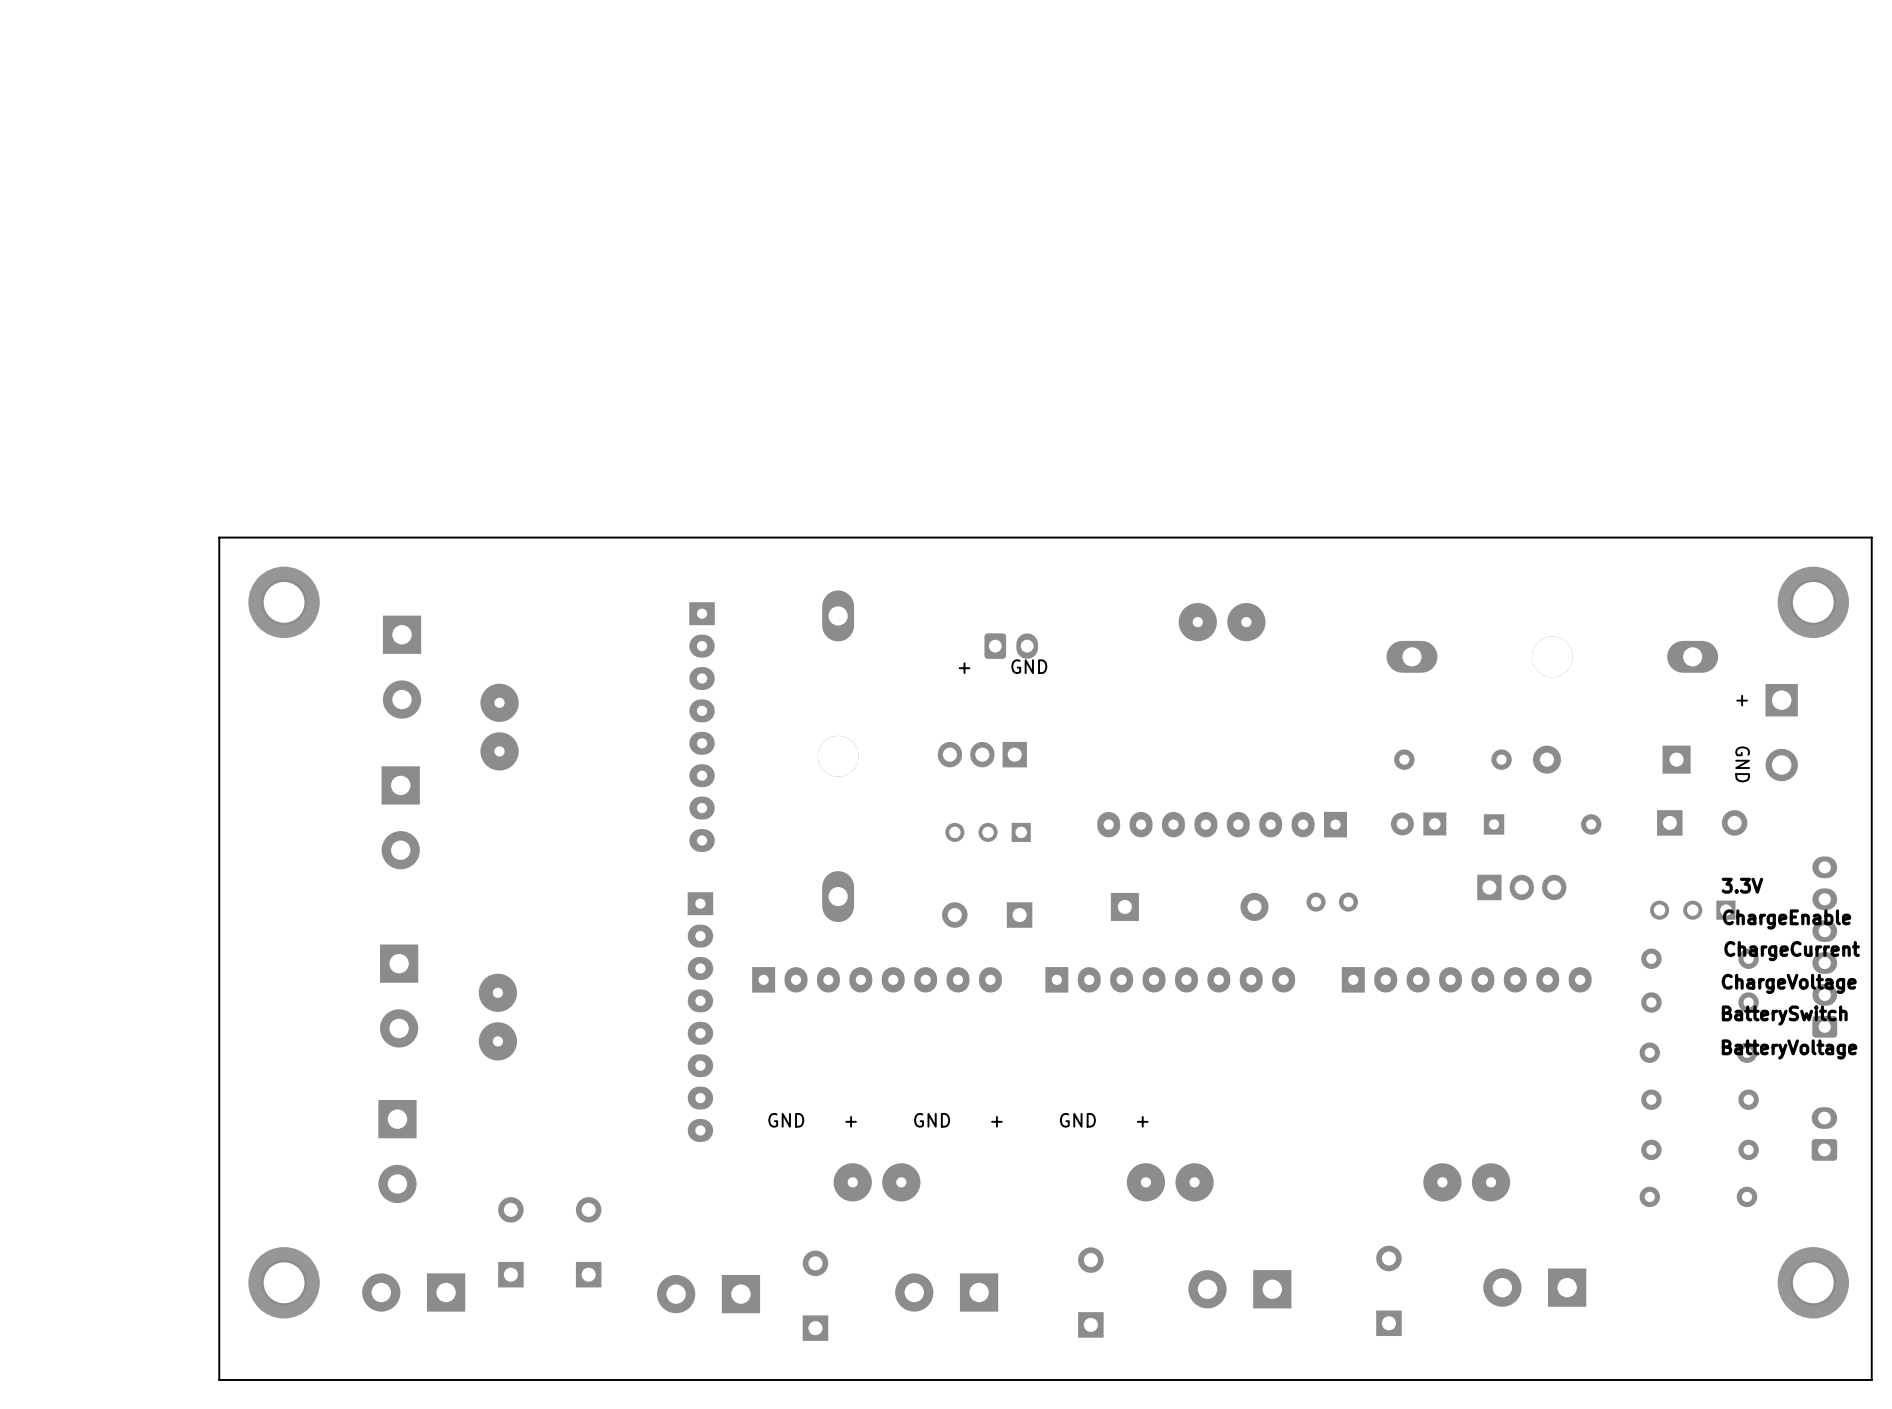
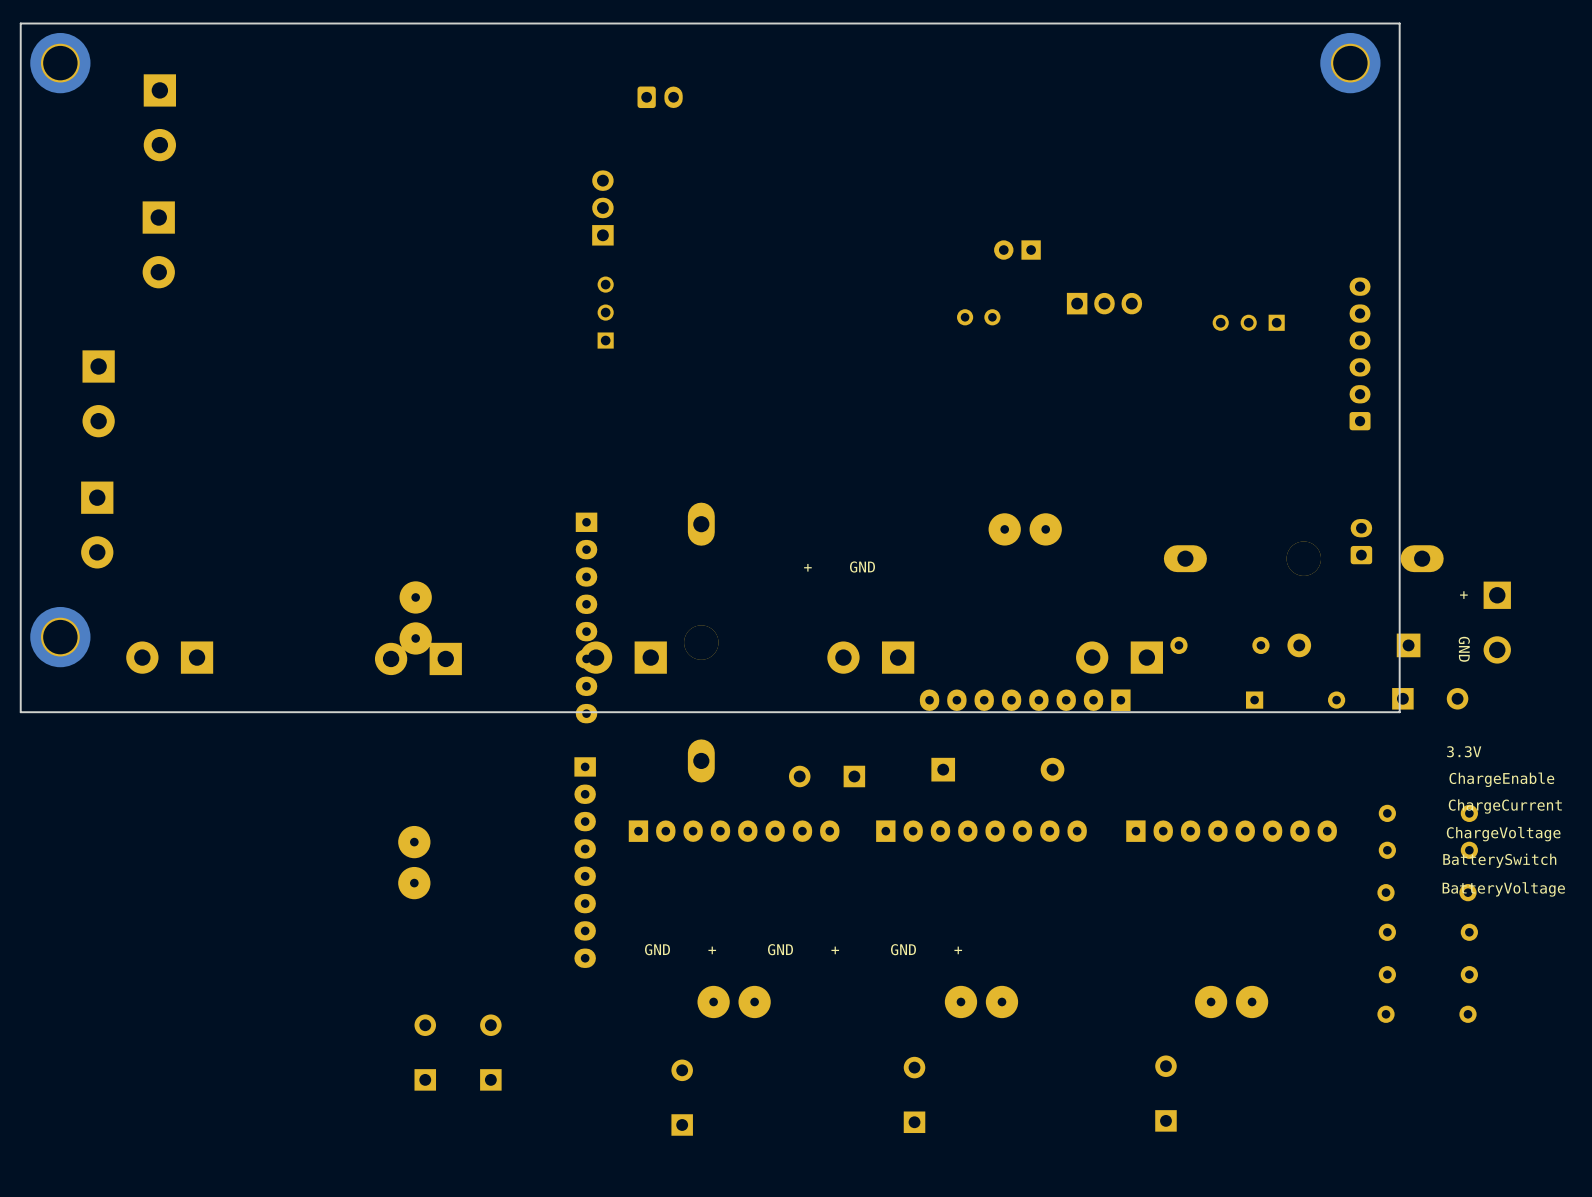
board edge: none -> (1399, 23) (20, 23) (20, 712) (1399, 712) (1399, 23)
part: none -> (60, 63)
part: none -> (1350, 63)
part: none -> (660, 97)
part: none -> (159, 117)
part: none -> (602, 207)
part: none -> (158, 244)
part: none -> (1017, 250)
part: none -> (1104, 303)
part: none -> (605, 312)
part: none -> (978, 317)
part: none -> (1248, 322)
part: none -> (1360, 353)
part: none -> (98, 393)
board edge: (1871, 537) (219, 537) (219, 1379) (1871, 1379) (1871, 537) -> none
part position: (284, 602) -> (60, 637)
part: (1813, 602) -> none
part: none -> (97, 525)
part: none -> (1361, 541)
part: (1011, 646) -> none
part: (402, 667) -> none
part: (982, 754) -> none
part: none -> (169, 657)
part: none -> (623, 657)
part: none -> (870, 657)
part: none -> (1119, 657)
part: none -> (418, 658)
part: (400, 817) -> none
part: (1418, 823) -> none
part: (988, 832) -> none
part: (1521, 887) -> none
part: (1332, 902) -> none
part: (1692, 910) -> none
part: (1824, 947) -> none
part: (399, 996) -> none
part: (1824, 1133) -> none
part: (397, 1151) -> none
part: (284, 1282) -> none
part: (1813, 1282) -> none
part: (1534, 1287) -> none
part: (1239, 1289) -> none
part: (413, 1292) -> none
part: (946, 1292) -> none
part: (708, 1294) -> none

